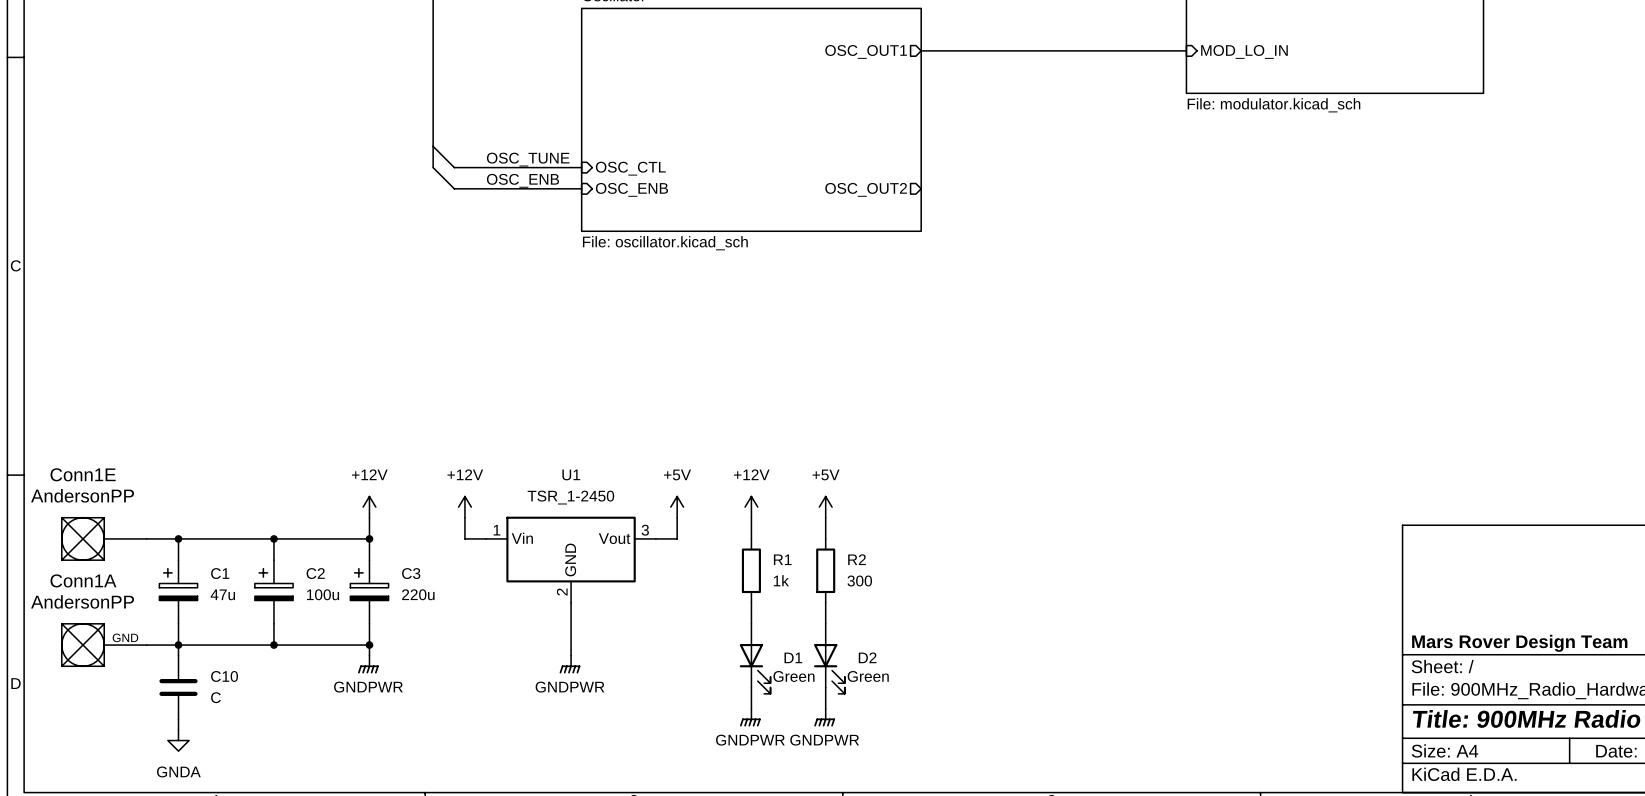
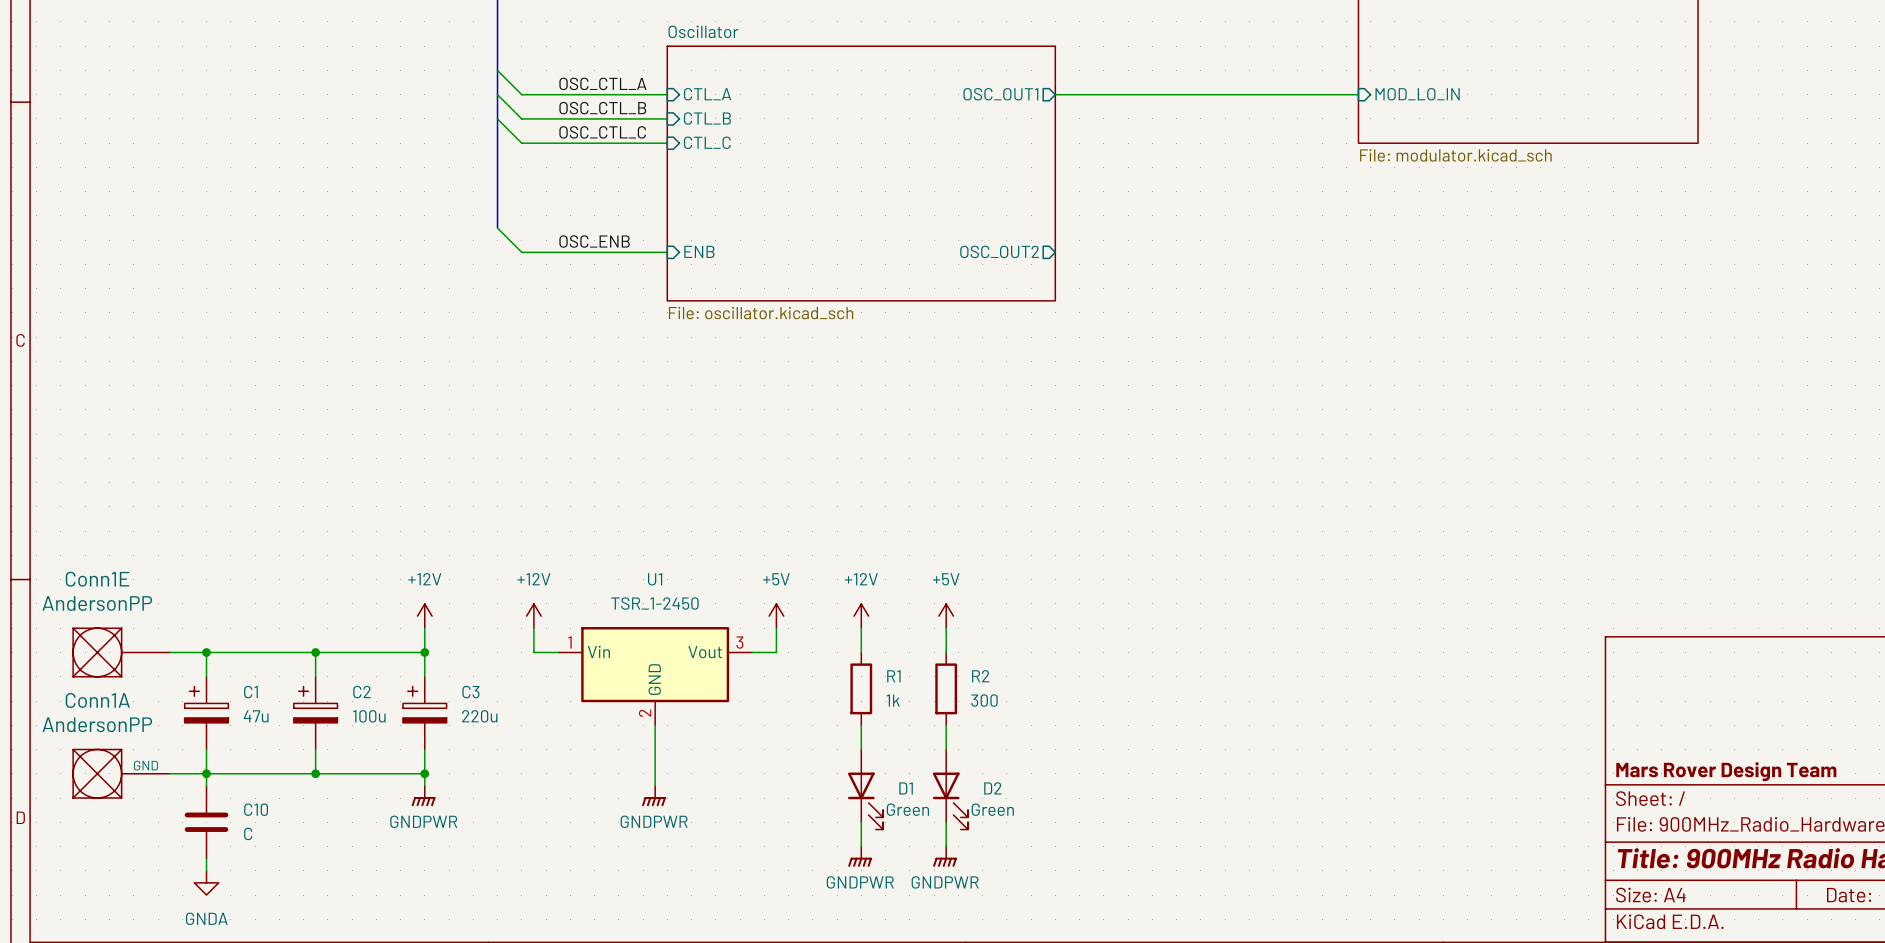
wire: none -> (497, 70) (521, 94) (667, 94)
label: none -> OSC_CTL_A (602, 83)
wire: none -> (497, 94) (521, 118) (667, 118)
sheet pin: none -> CTL_A (707, 94)
label: none -> OSC_CTL_B (602, 108)
sheet pin: none -> CTL_B (707, 118)
label: none -> OSC_CTL_C (602, 132)
sheet pin: none -> CTL_C (707, 142)
wire: (433, 146) (454, 167) (581, 167) -> (497, 118) (521, 143) (667, 143)
label: OSC_TUNE (528, 159) -> none
sheet pin: OSC_CTL (630, 168) -> none
sheet pin: OSC_ENB (631, 189) -> ENB (699, 251)

